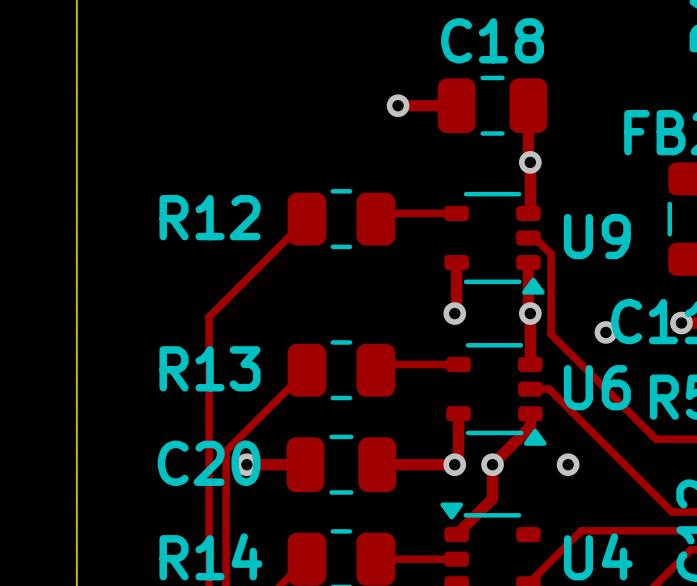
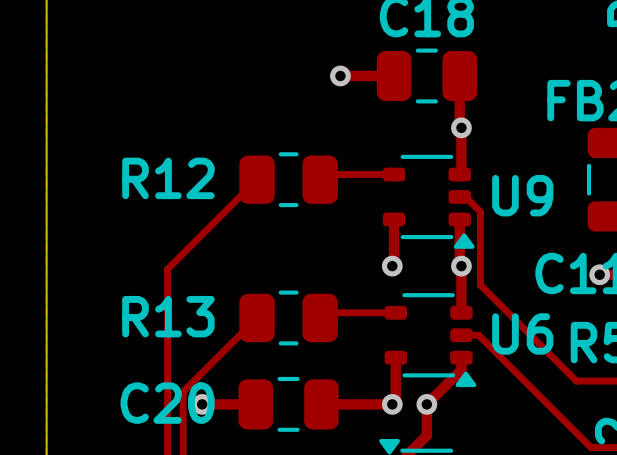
via: (605, 332) -> none
via: (568, 464) -> none

